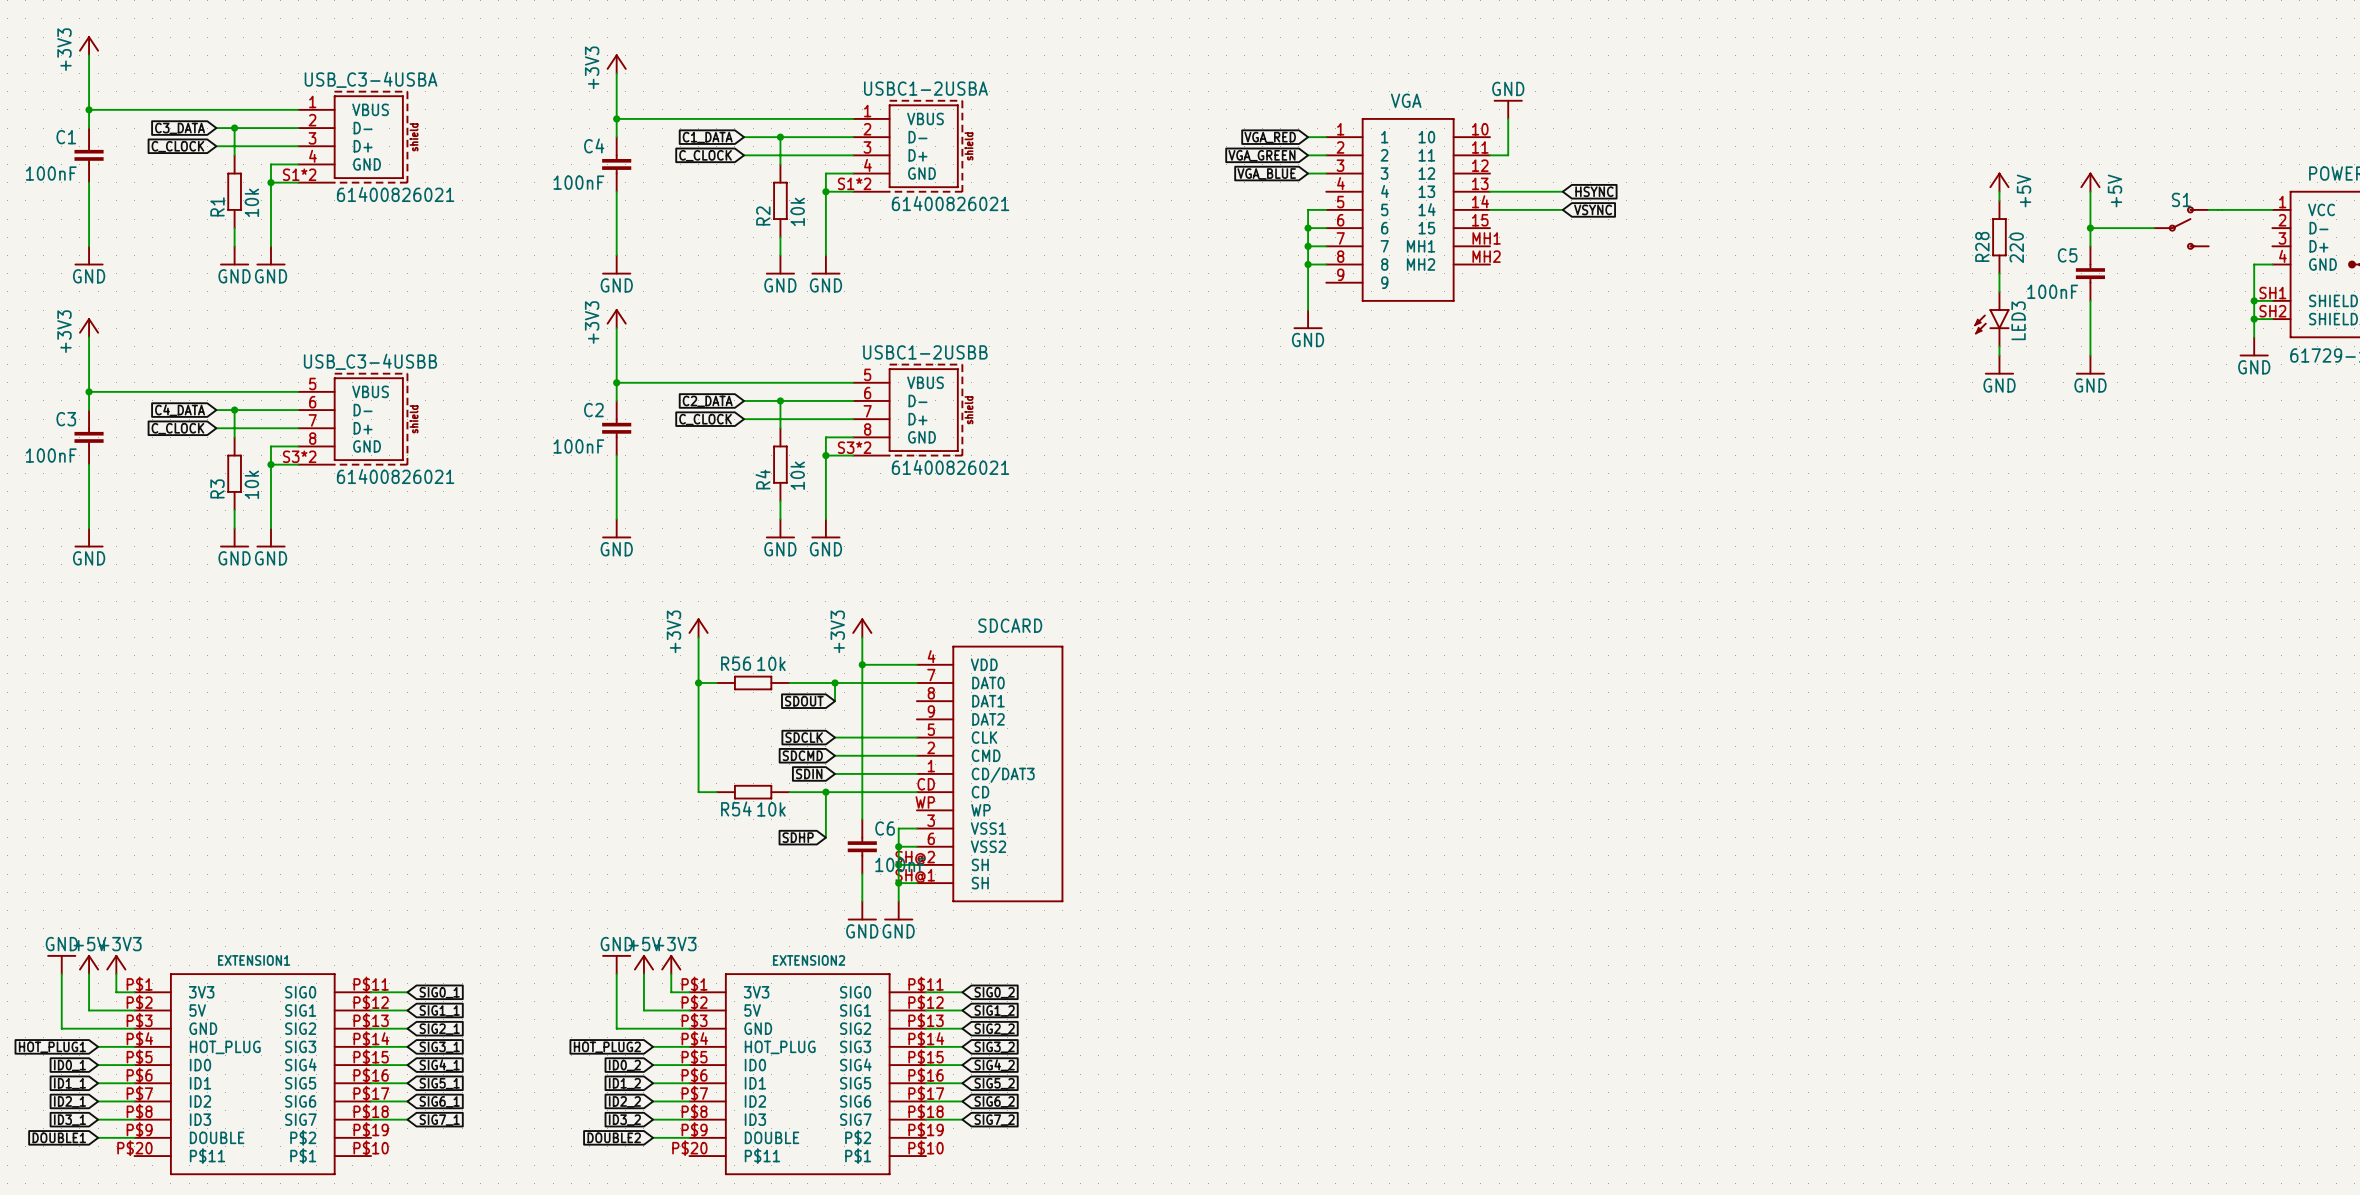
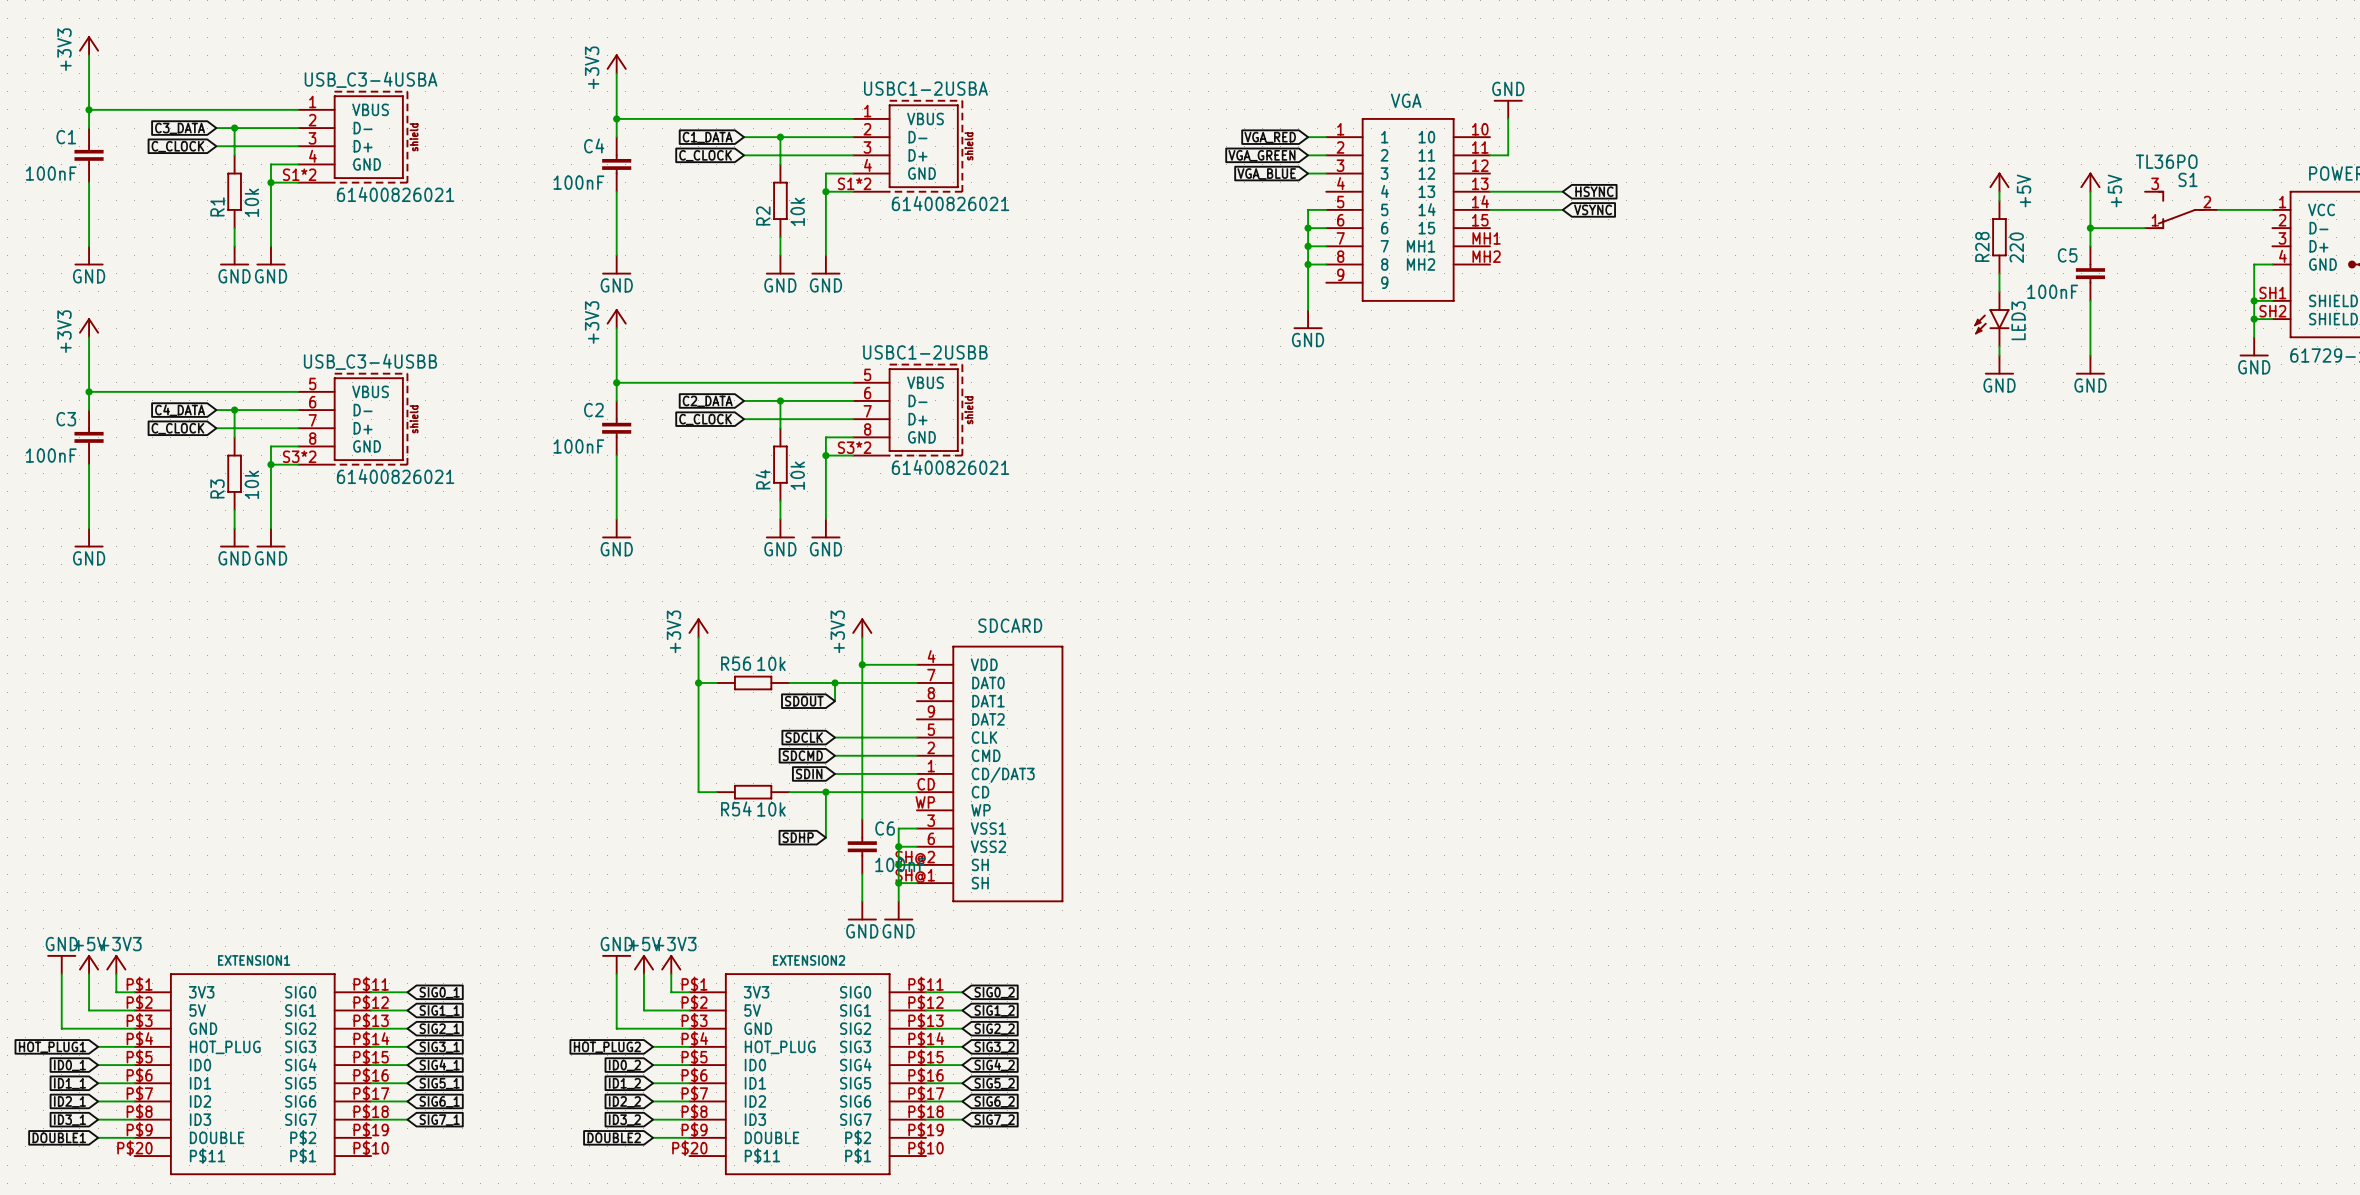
S1 value: none -> TL36PO (2166, 161)
S1 symbol: [2154, 206, 2209, 250] -> [2145, 190, 2218, 230]

